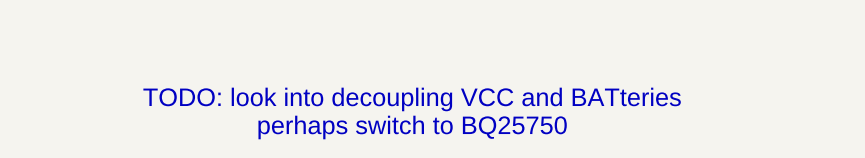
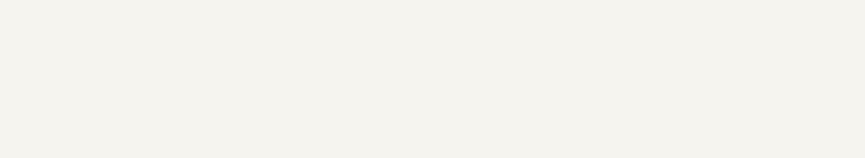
text: TODO: look into decoupling VCC and BATteries (412, 99) -> none
text: perhaps switch to BQ25750 (412, 127) -> none

